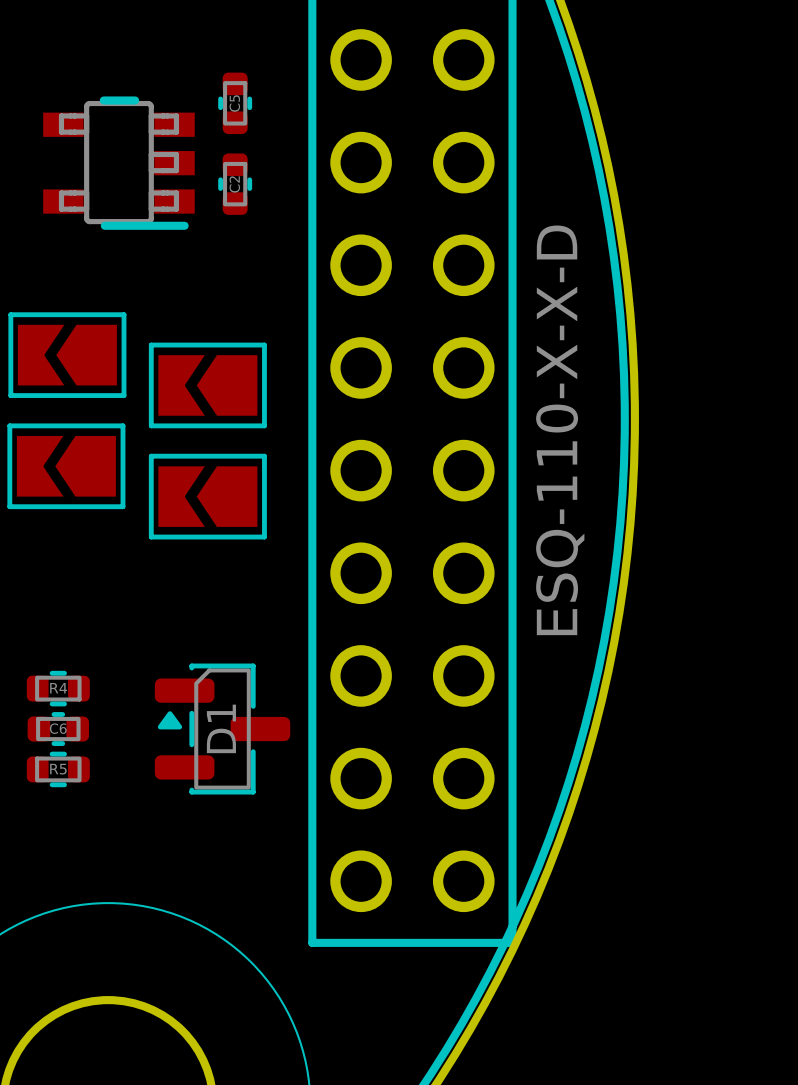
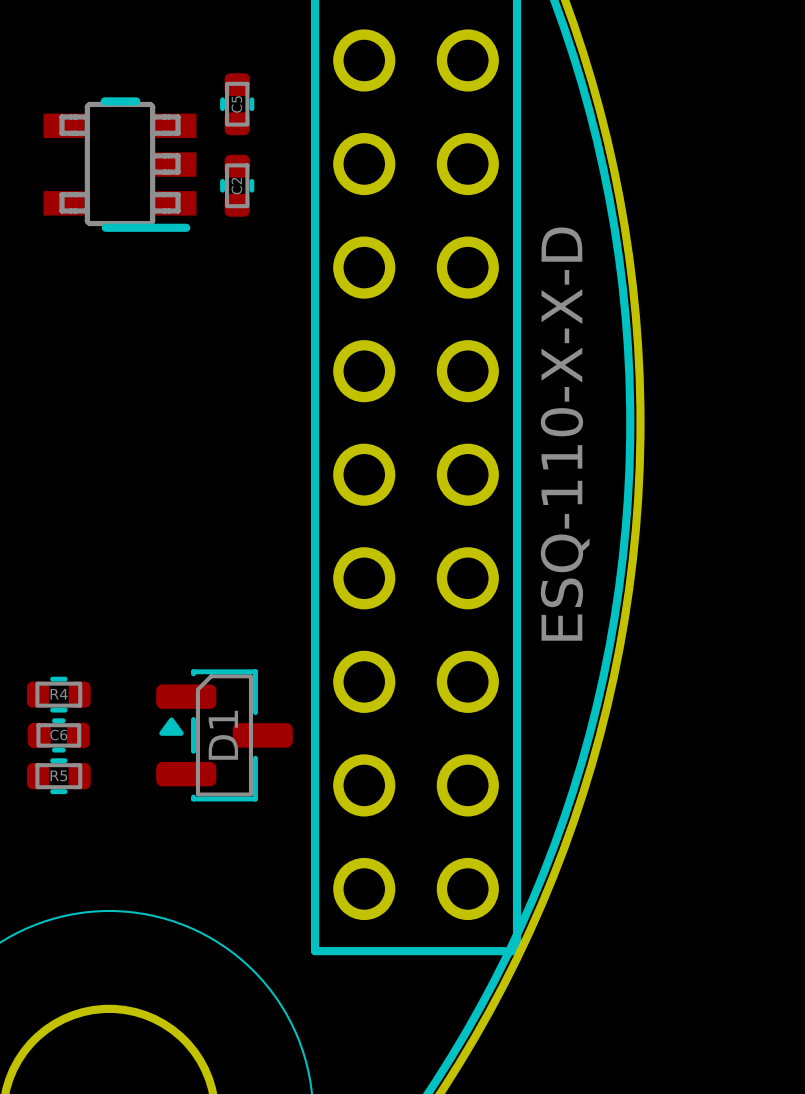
part: (67, 355) -> none
part: (207, 385) -> none
part: (66, 466) -> none
part: (207, 496) -> none

